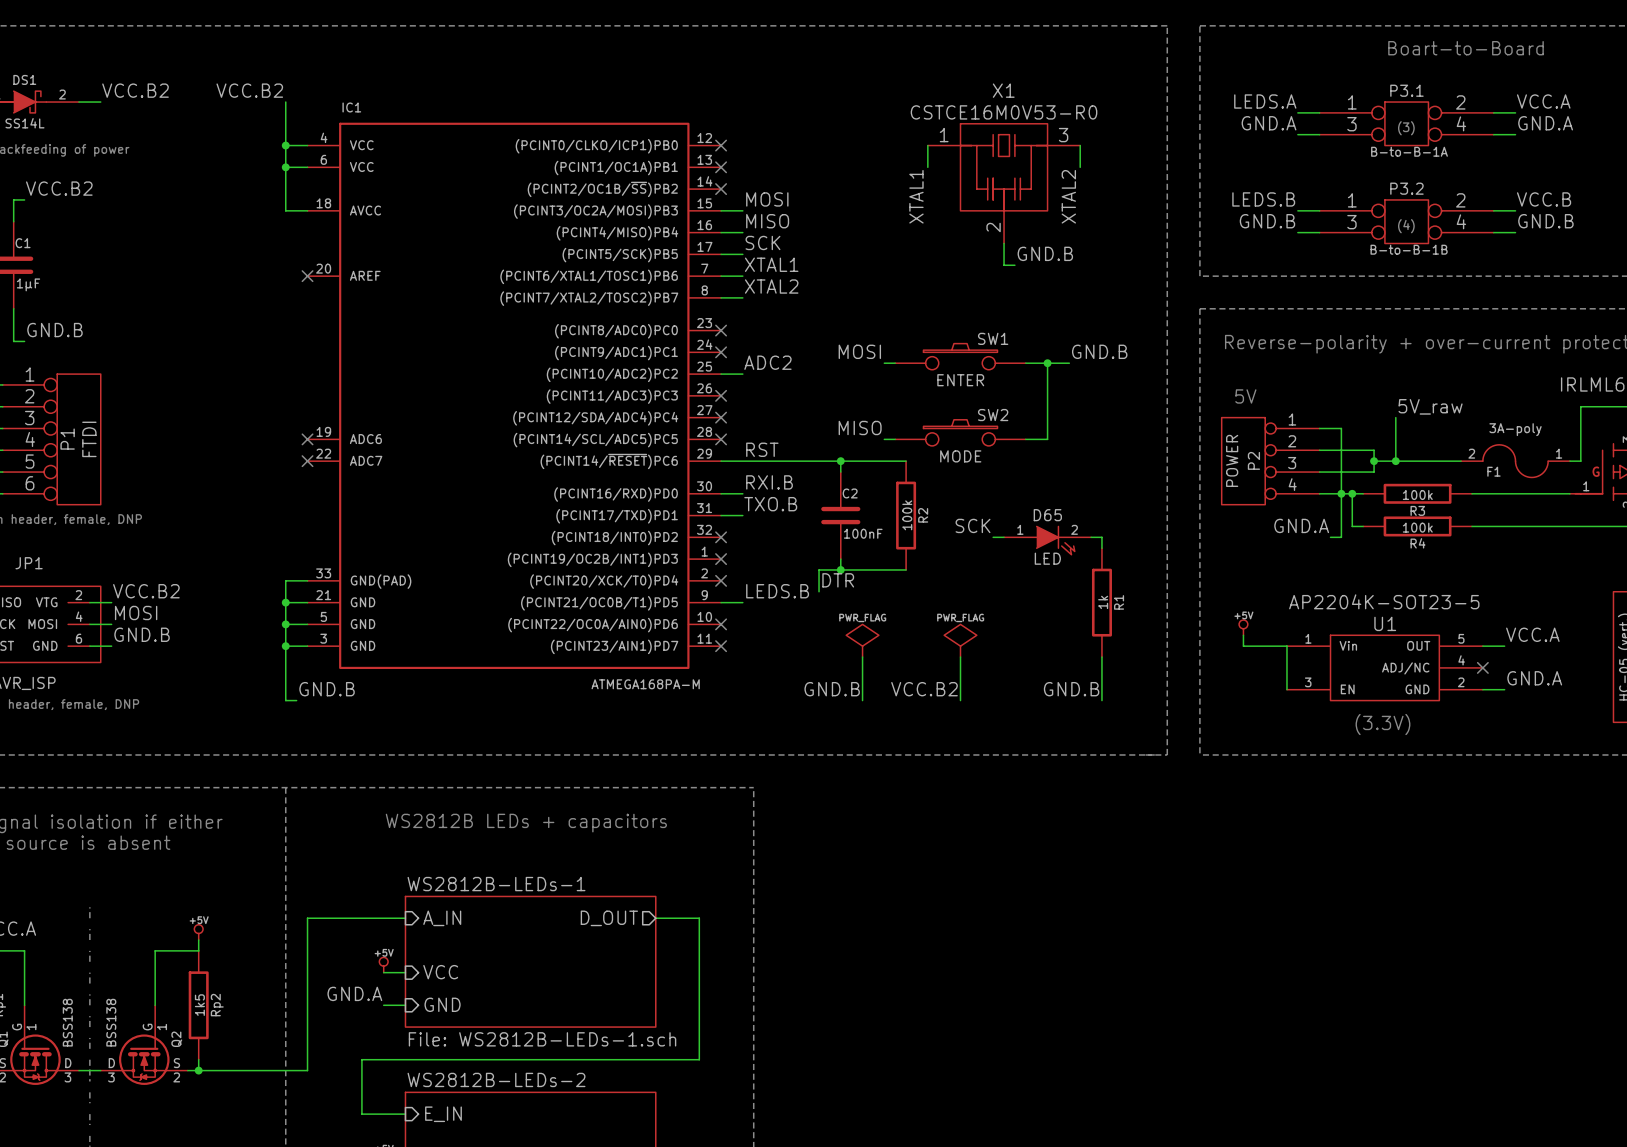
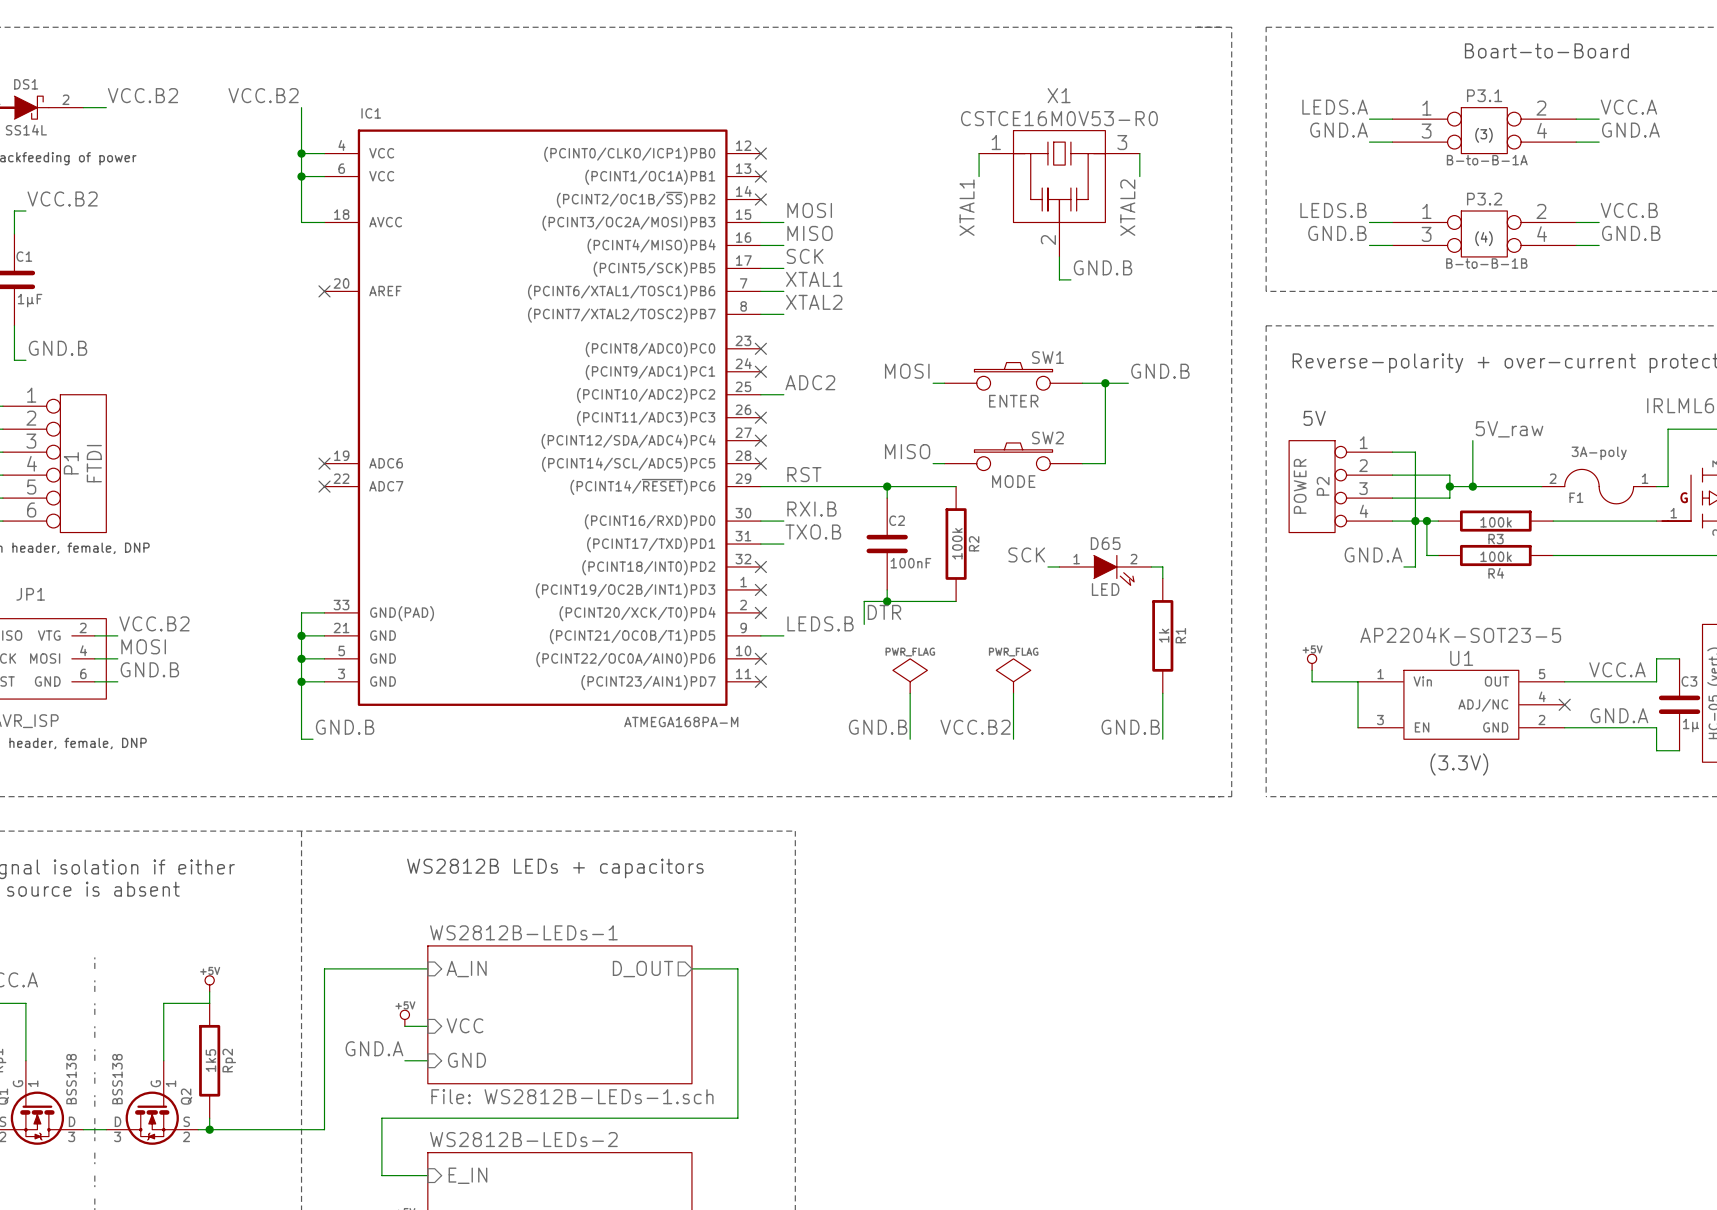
wire: none -> (1679, 658) (1656, 658) (1656, 681) (1587, 681)
C3: none -> 1µ (1679, 704)
wire: none -> (1587, 727) (1656, 727) (1656, 750) (1679, 750)

